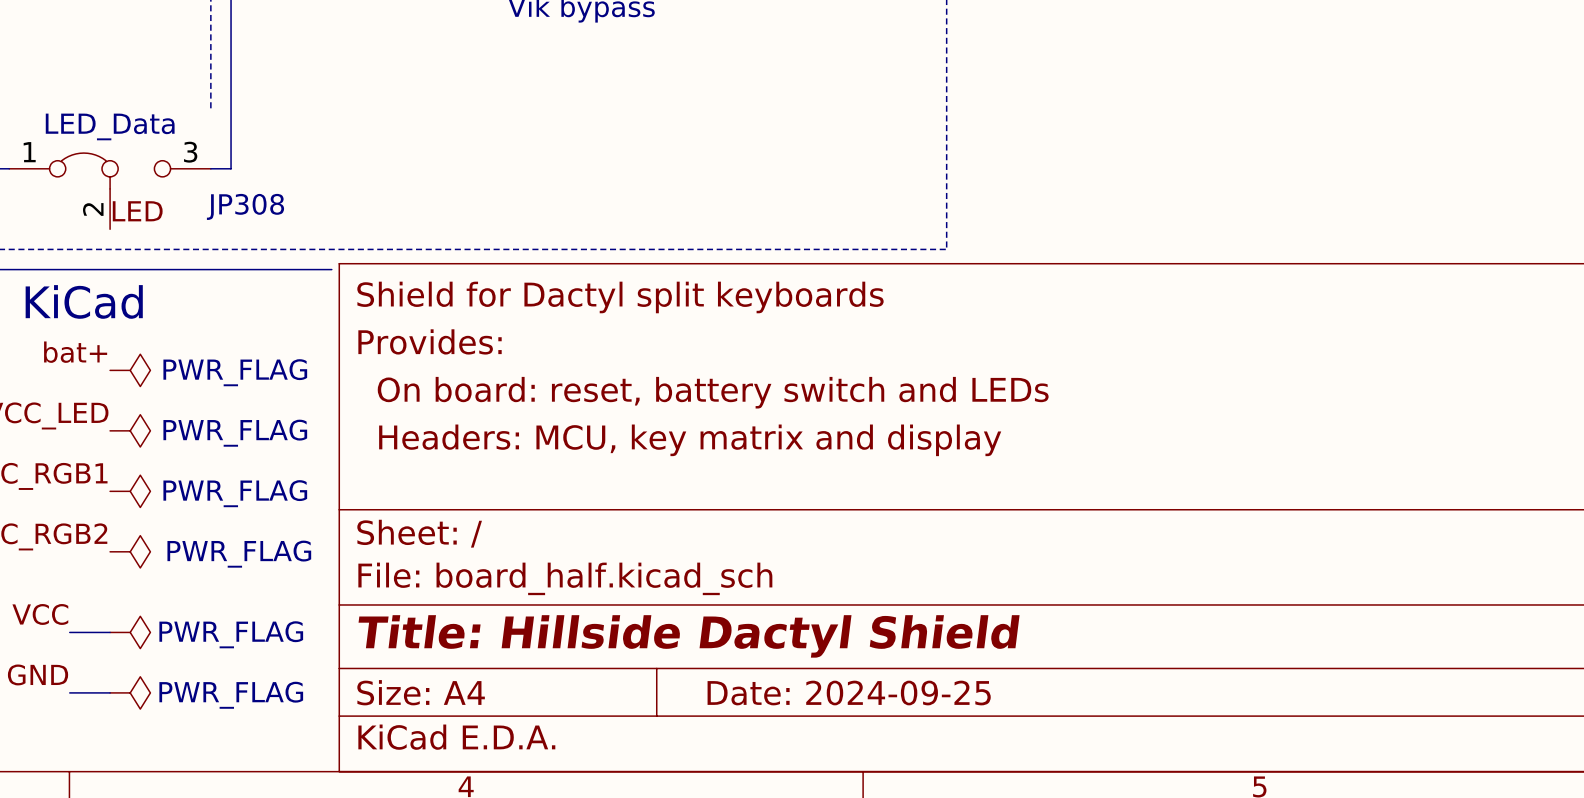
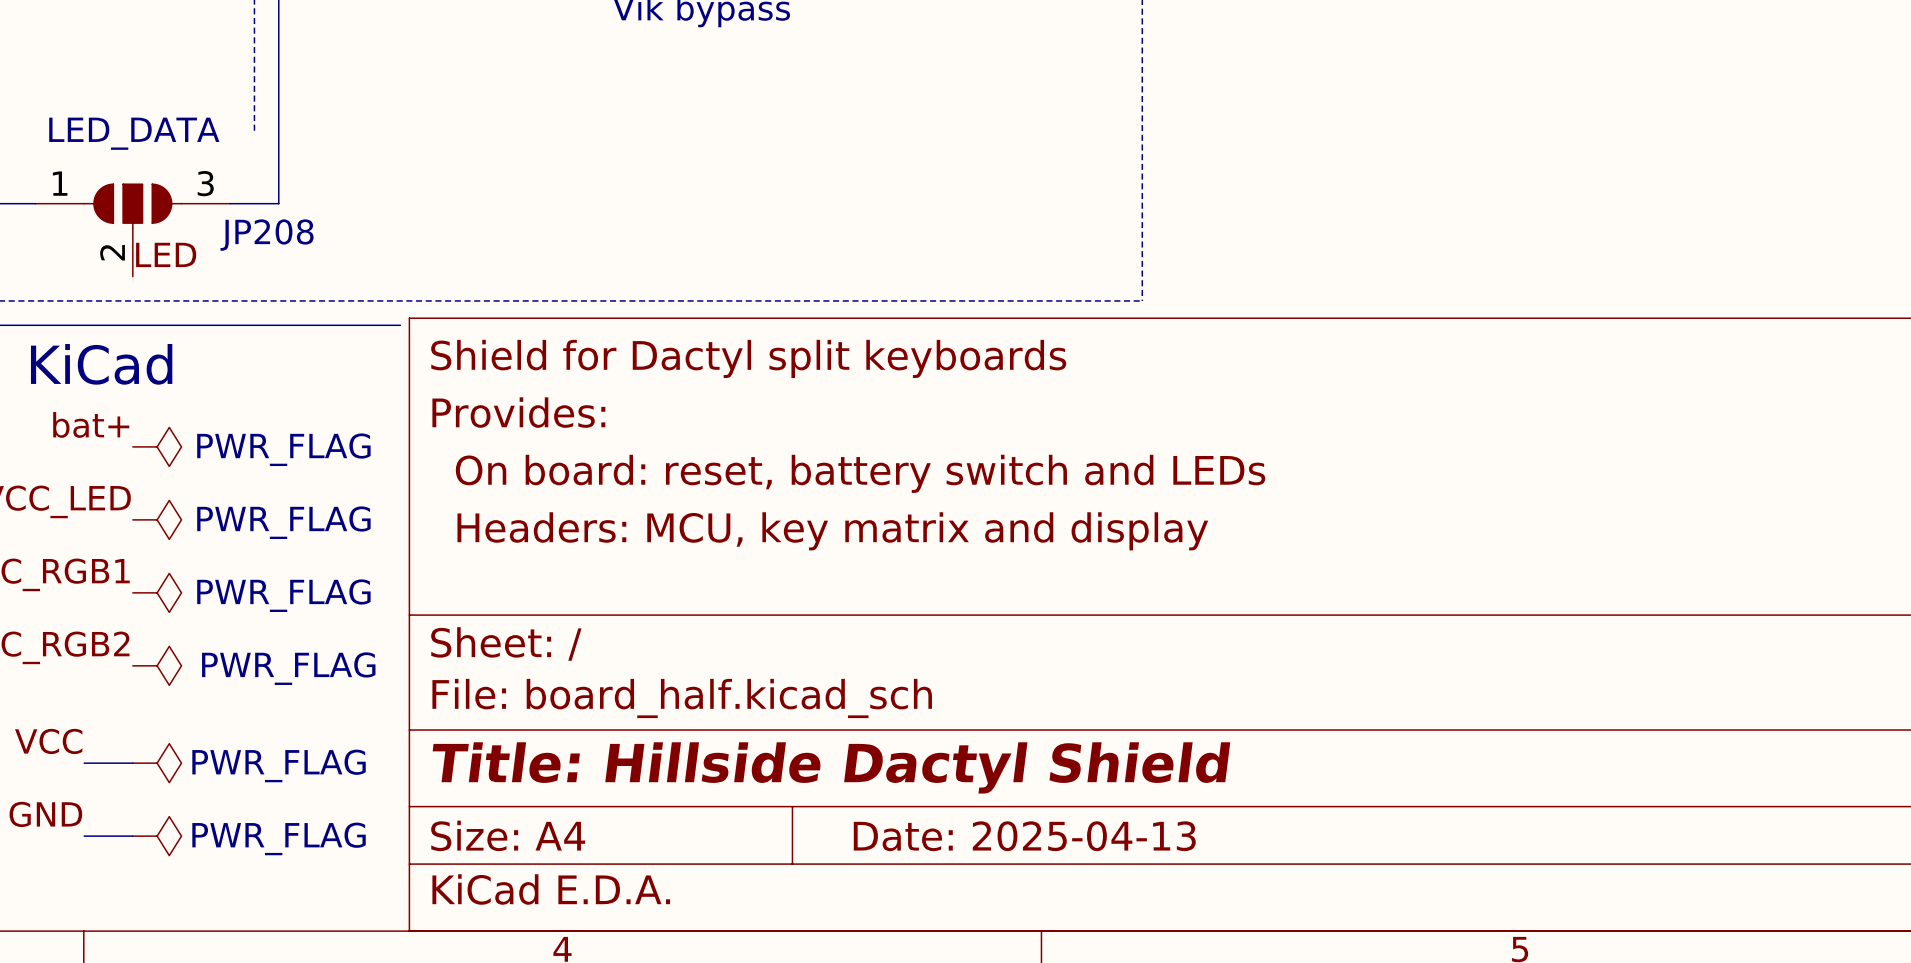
JP208: none -> LED_DATA (132, 230)
JP308: LED_Data (110, 191) -> none
title block: Date: 2024-09-25 (849, 693) -> Date: 2025-04-13 (1024, 836)

